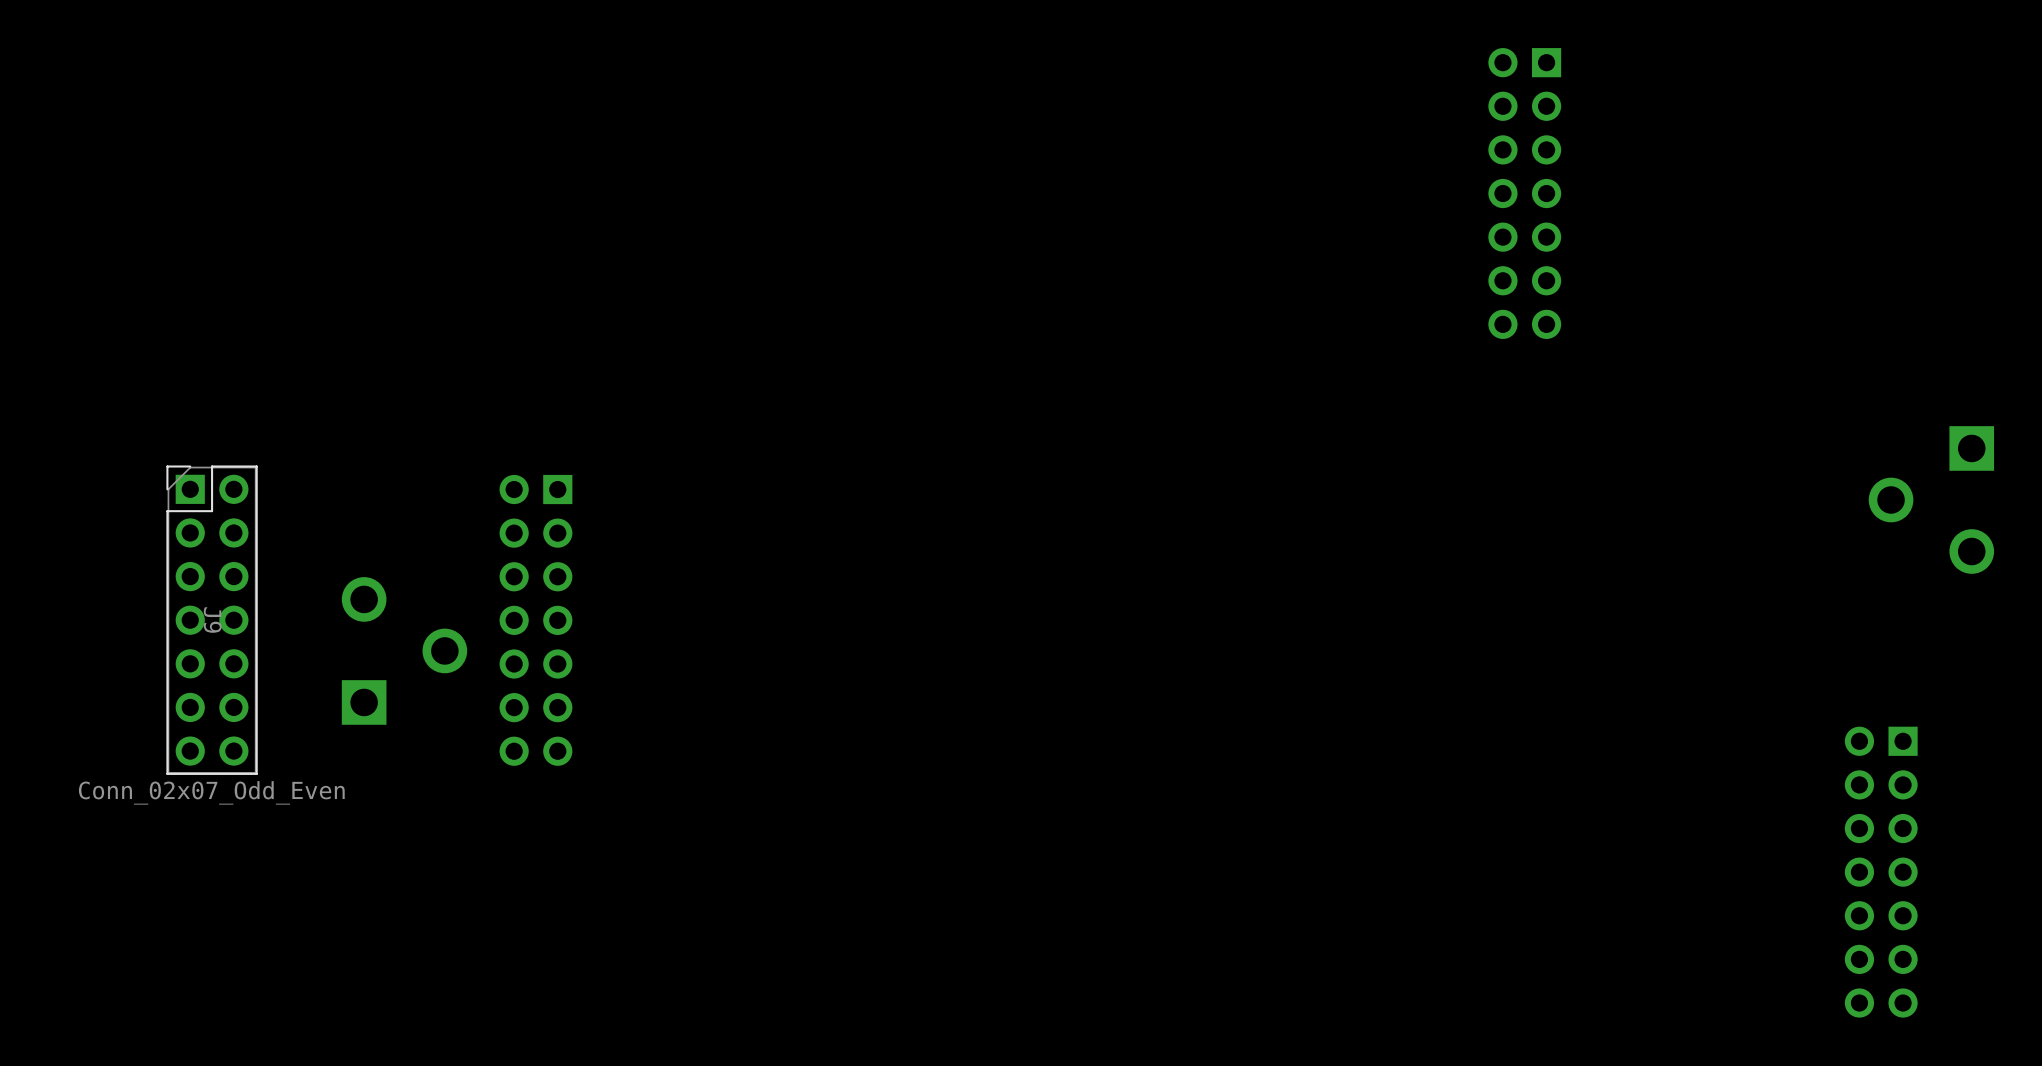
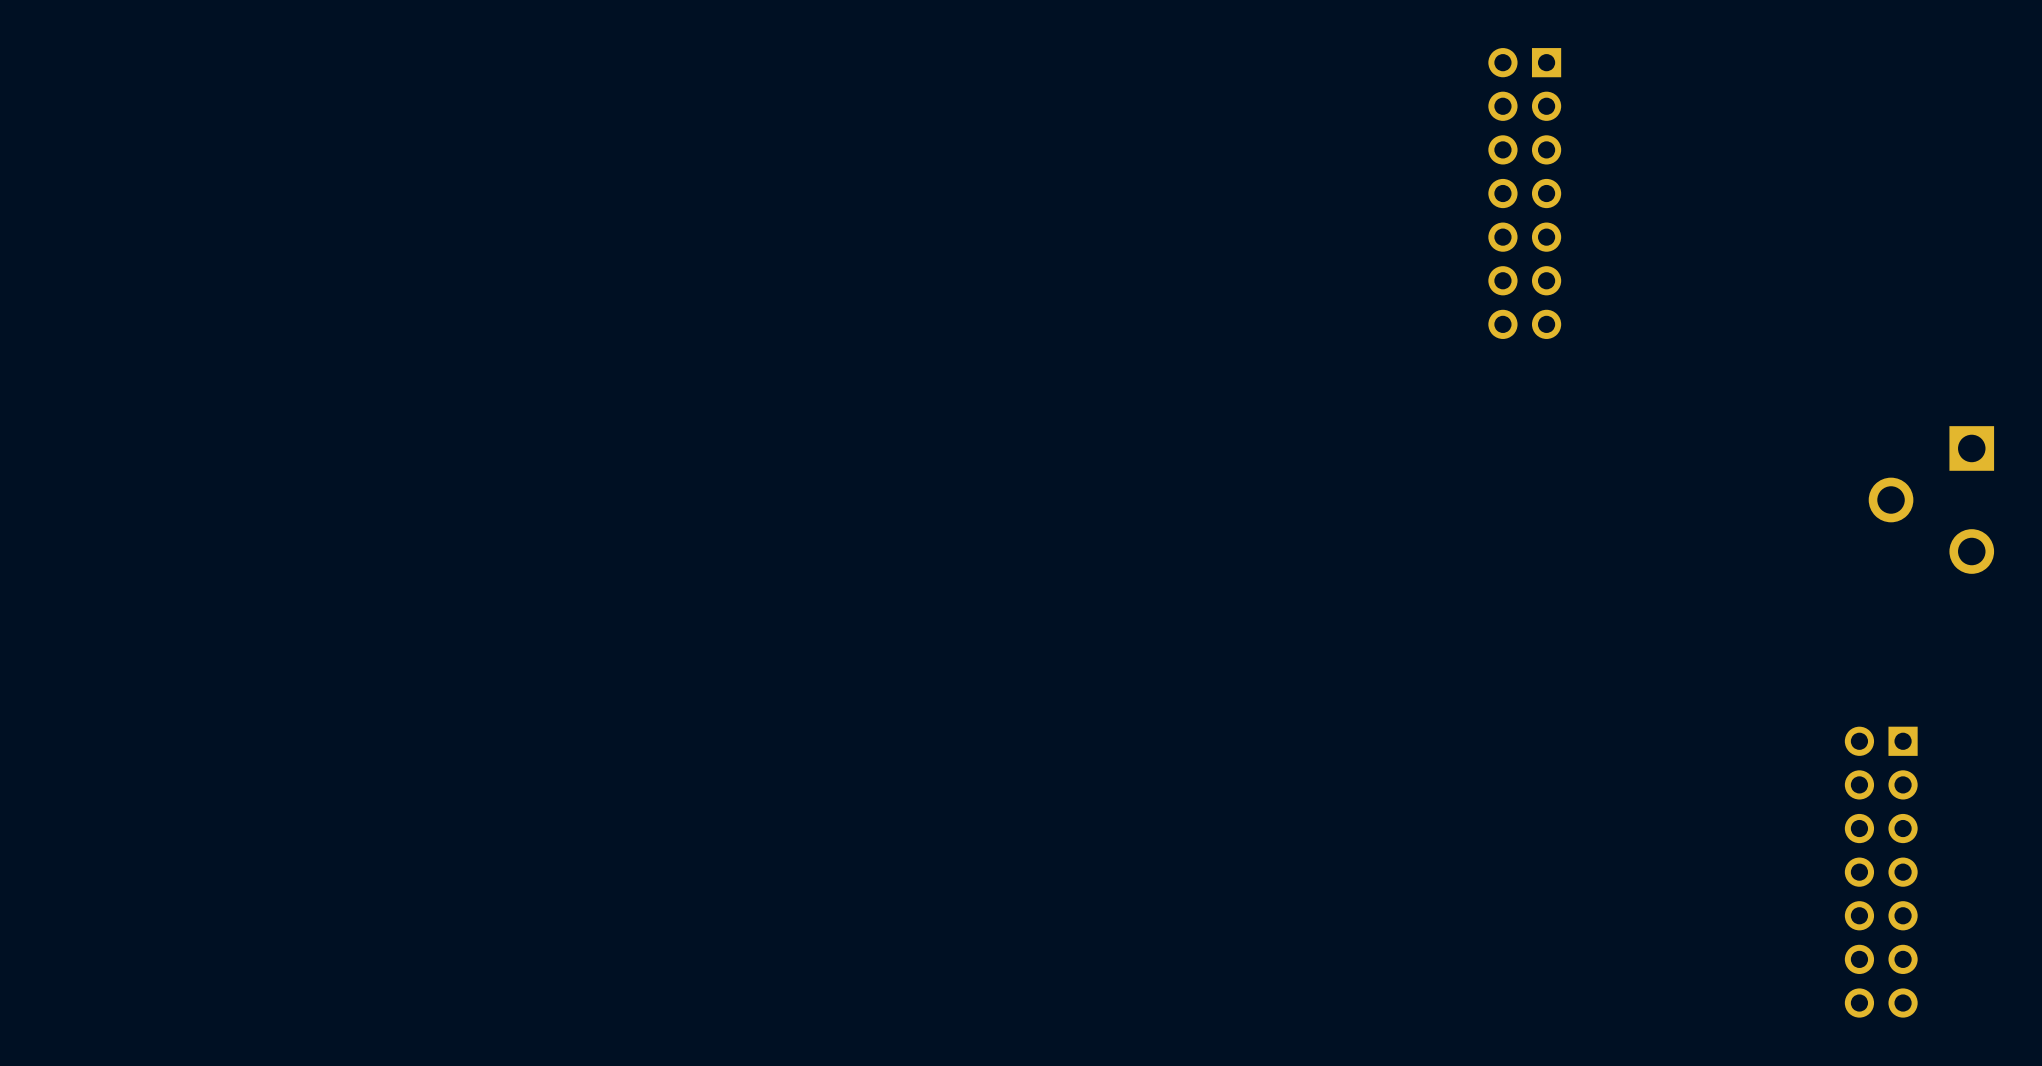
J9: Conn_02x07_Odd_Even (212, 620) -> none
part: (535, 620) -> none
part: (404, 650) -> none

